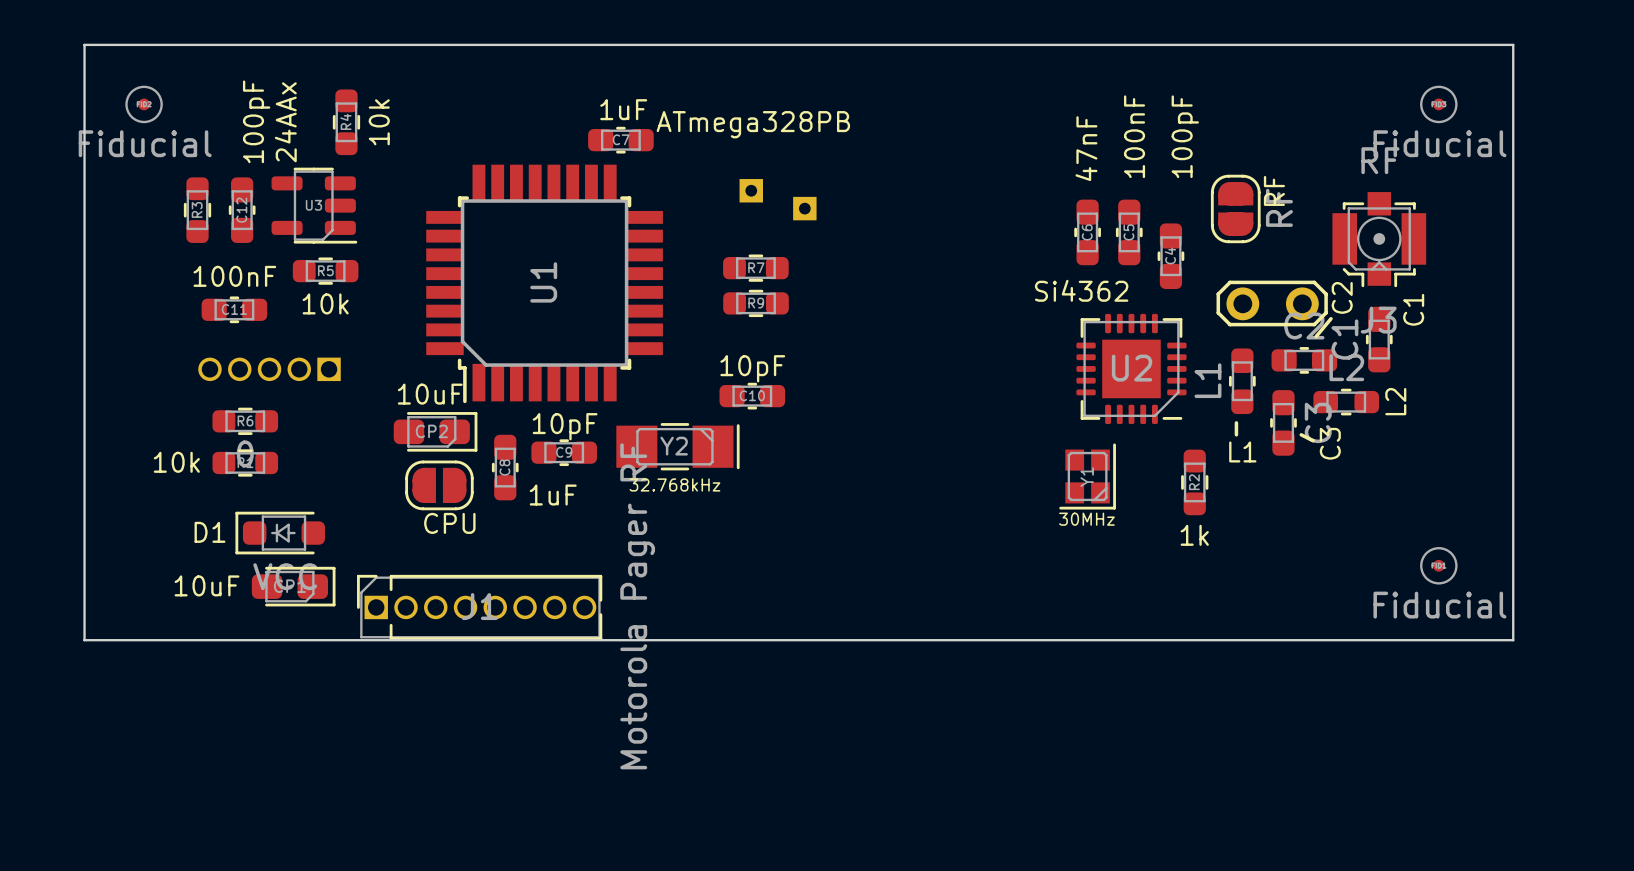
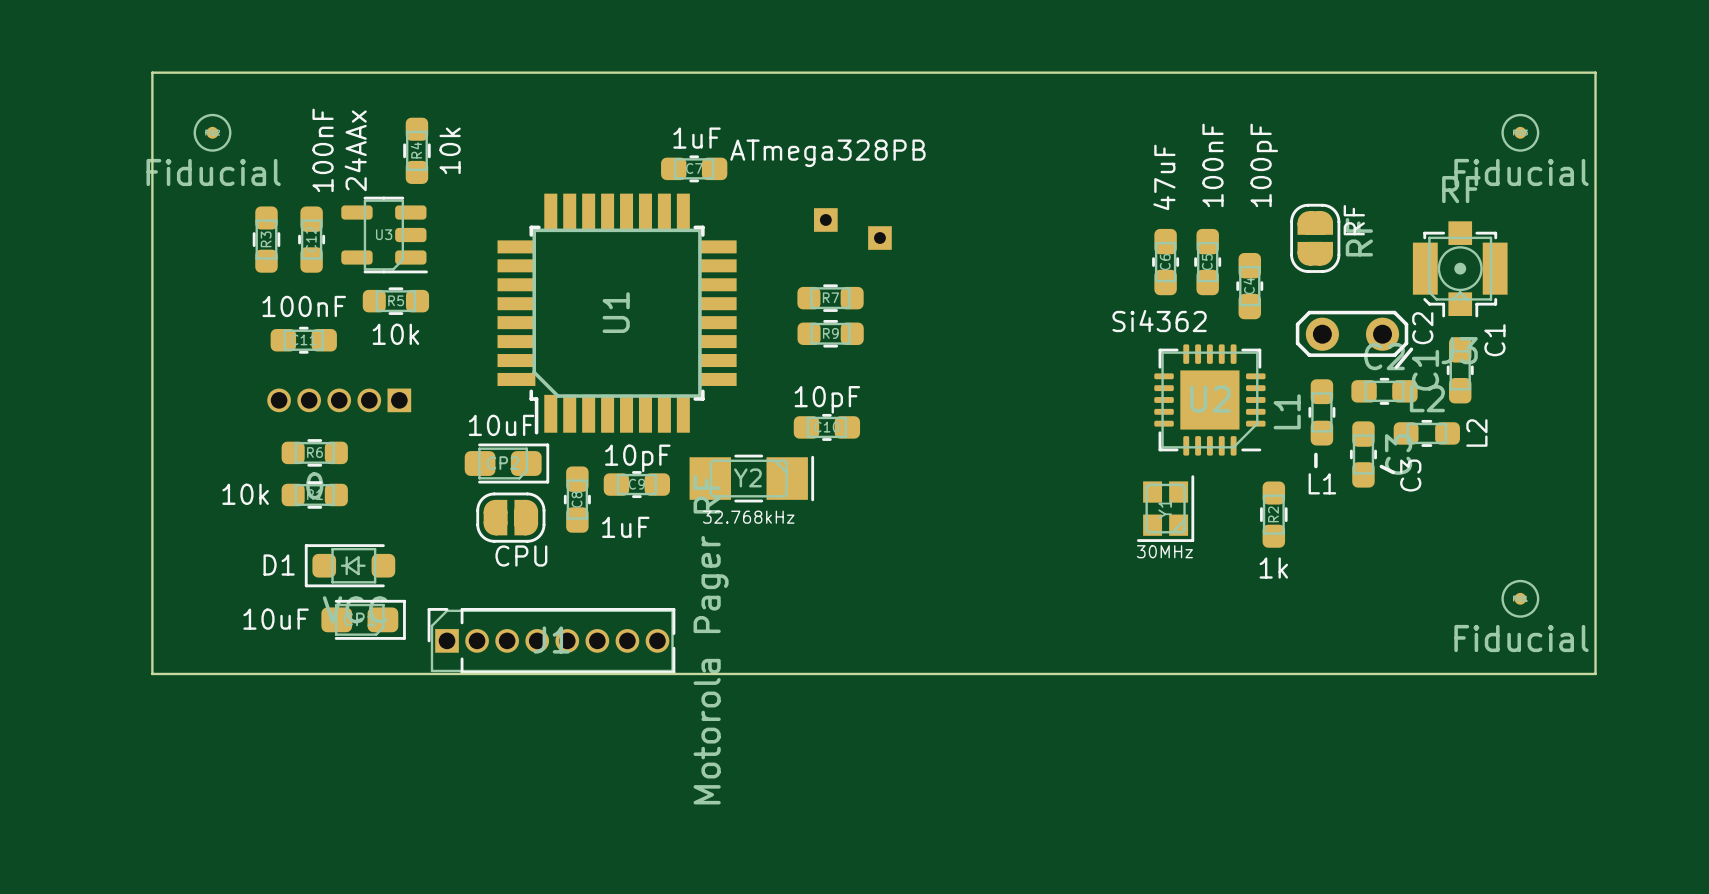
C12 value: 100pF (256, 121) -> 100nF (323, 150)
C6 value: 47nF (1086, 148) -> 47uF (1164, 177)

